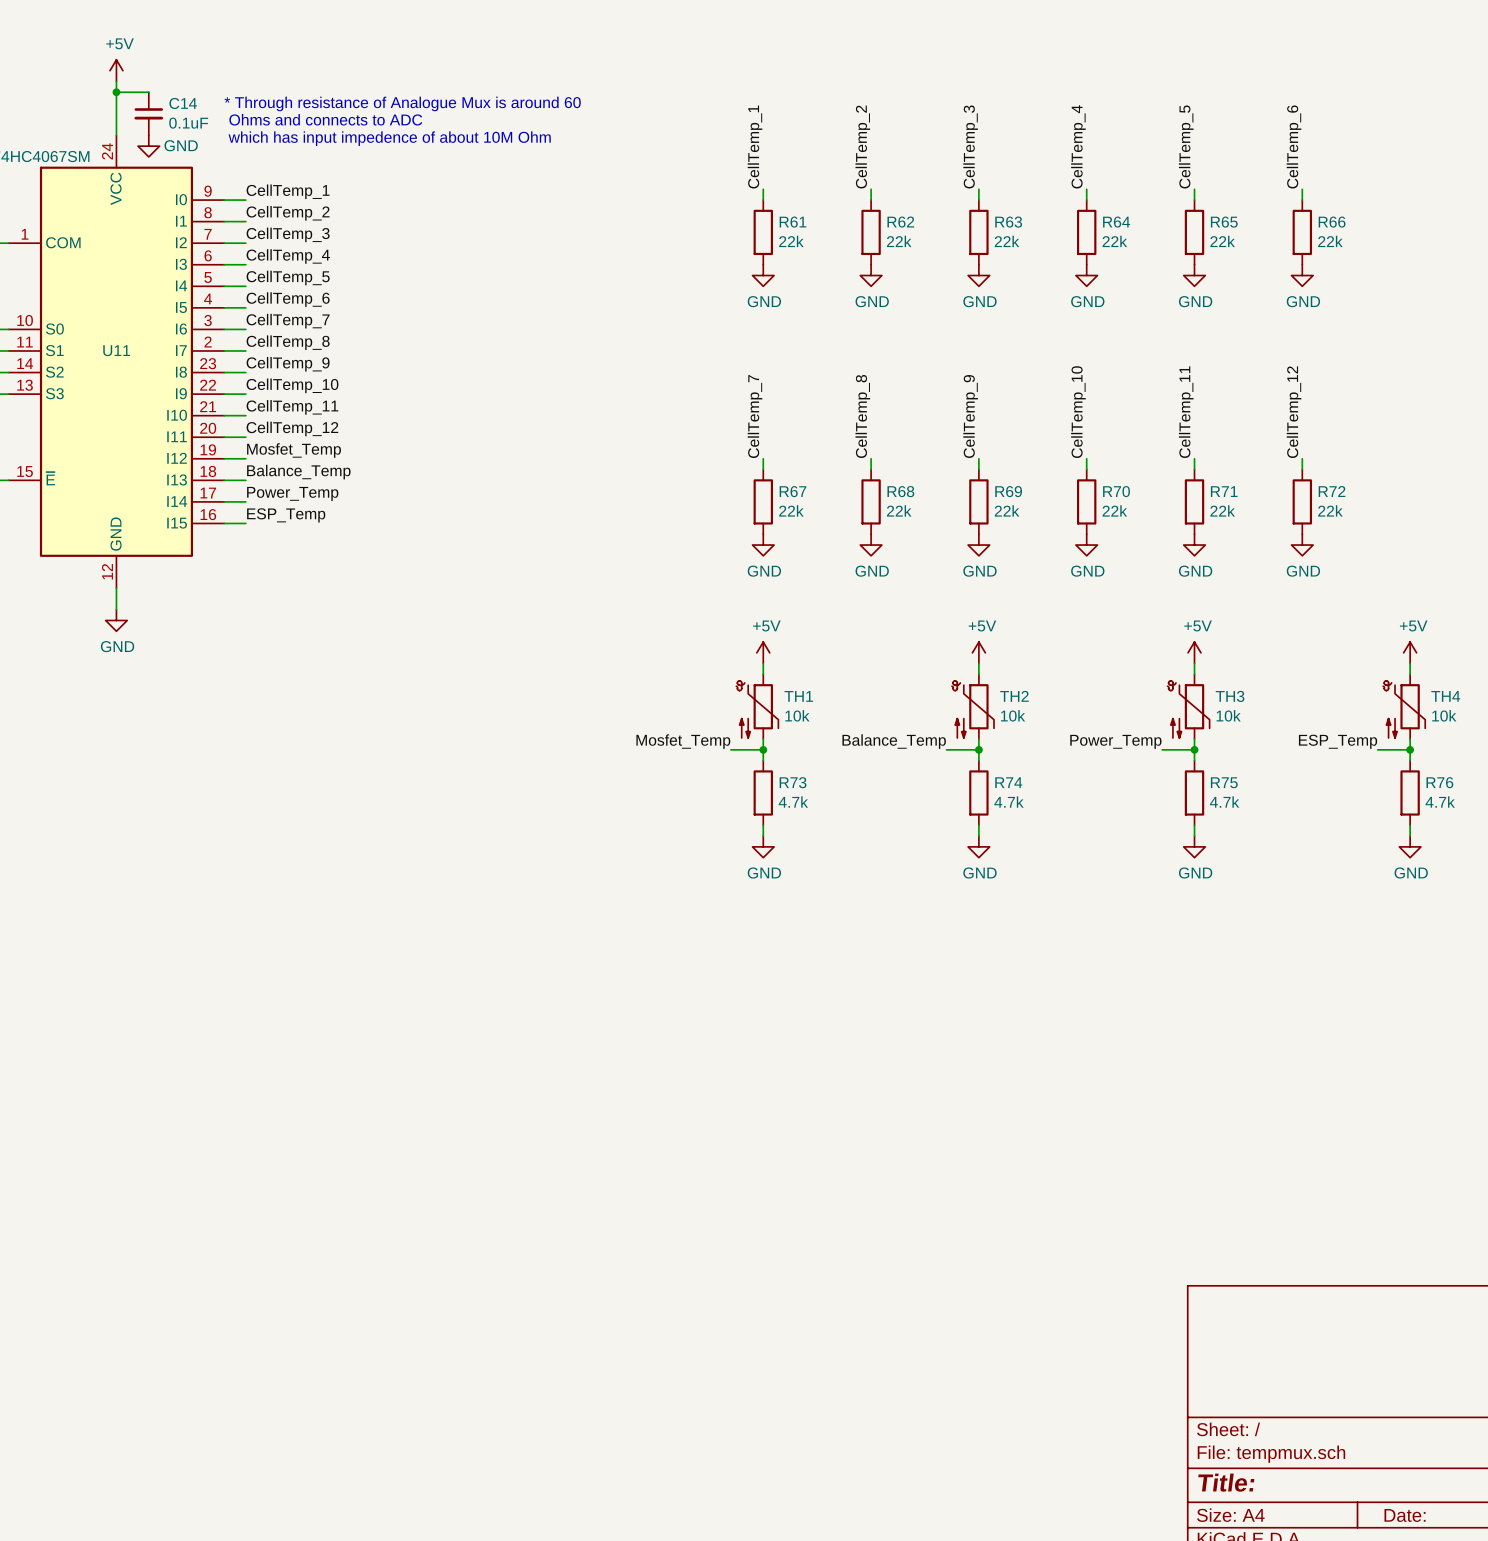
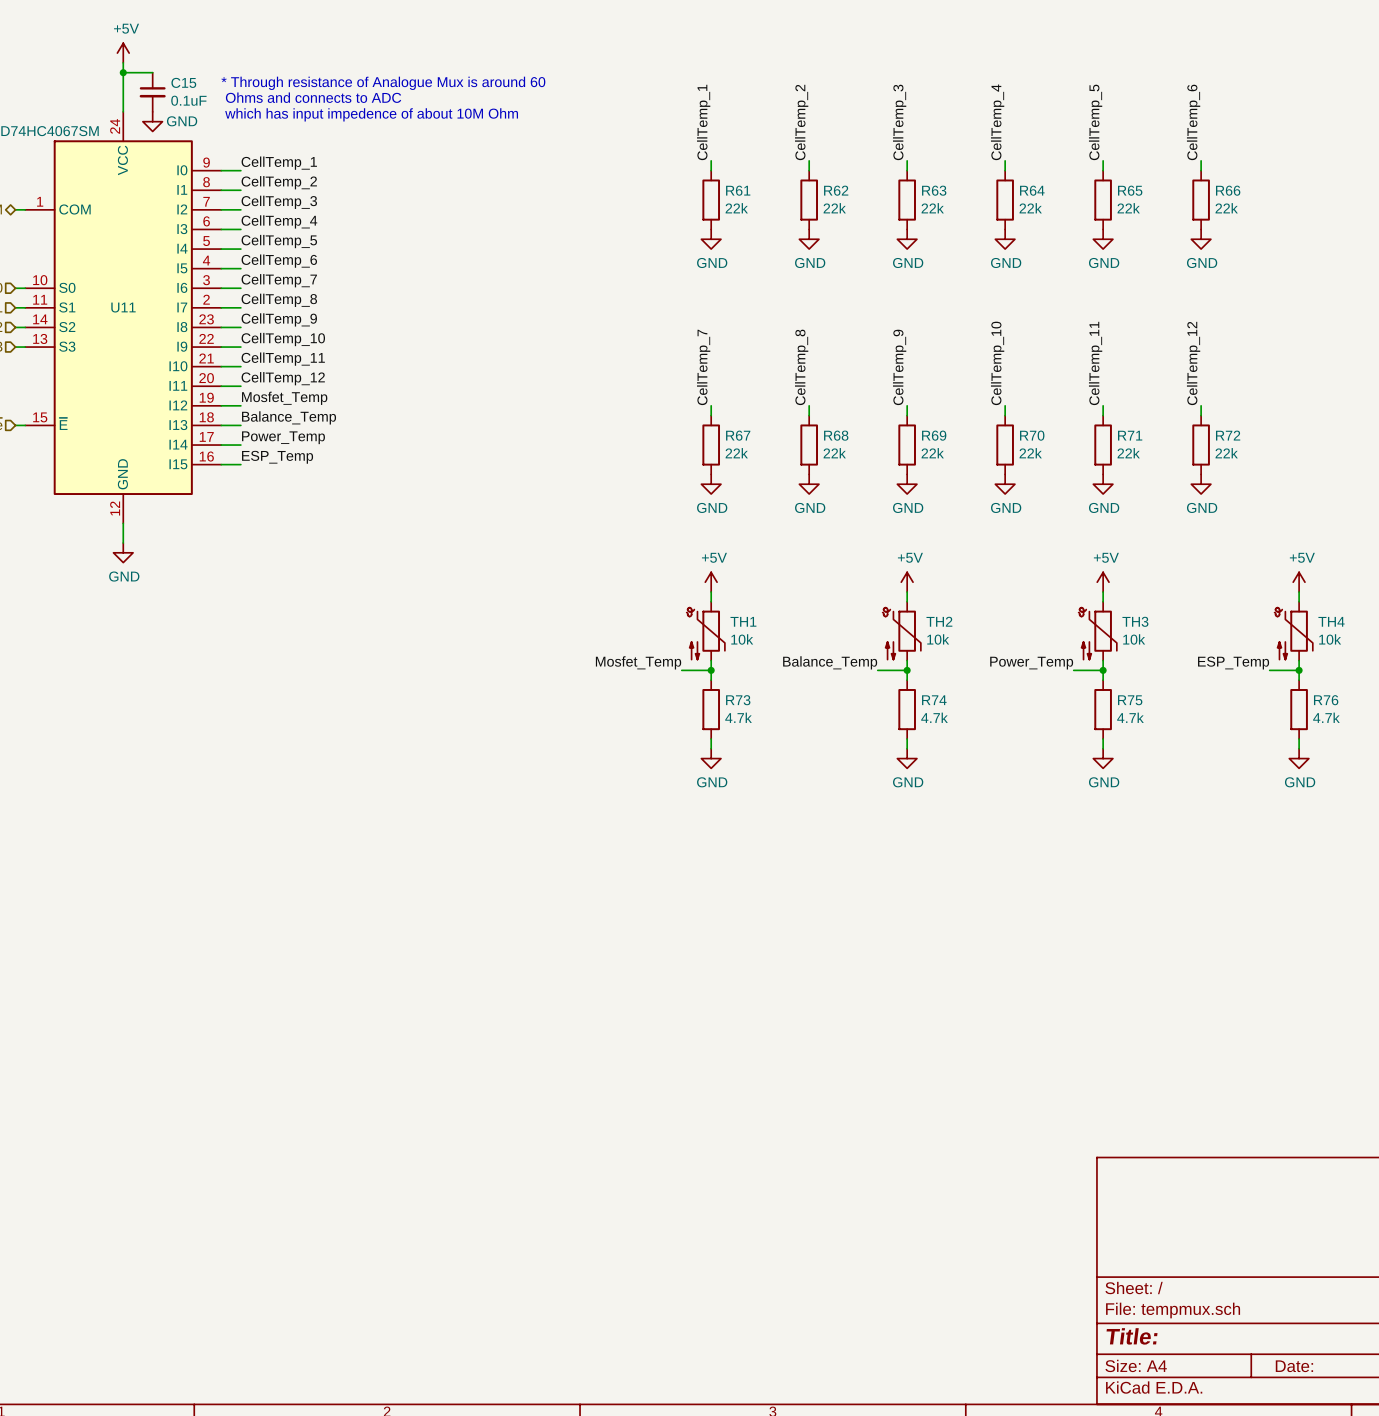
C14 name: C14 (183, 103) -> C15 (183, 82)

